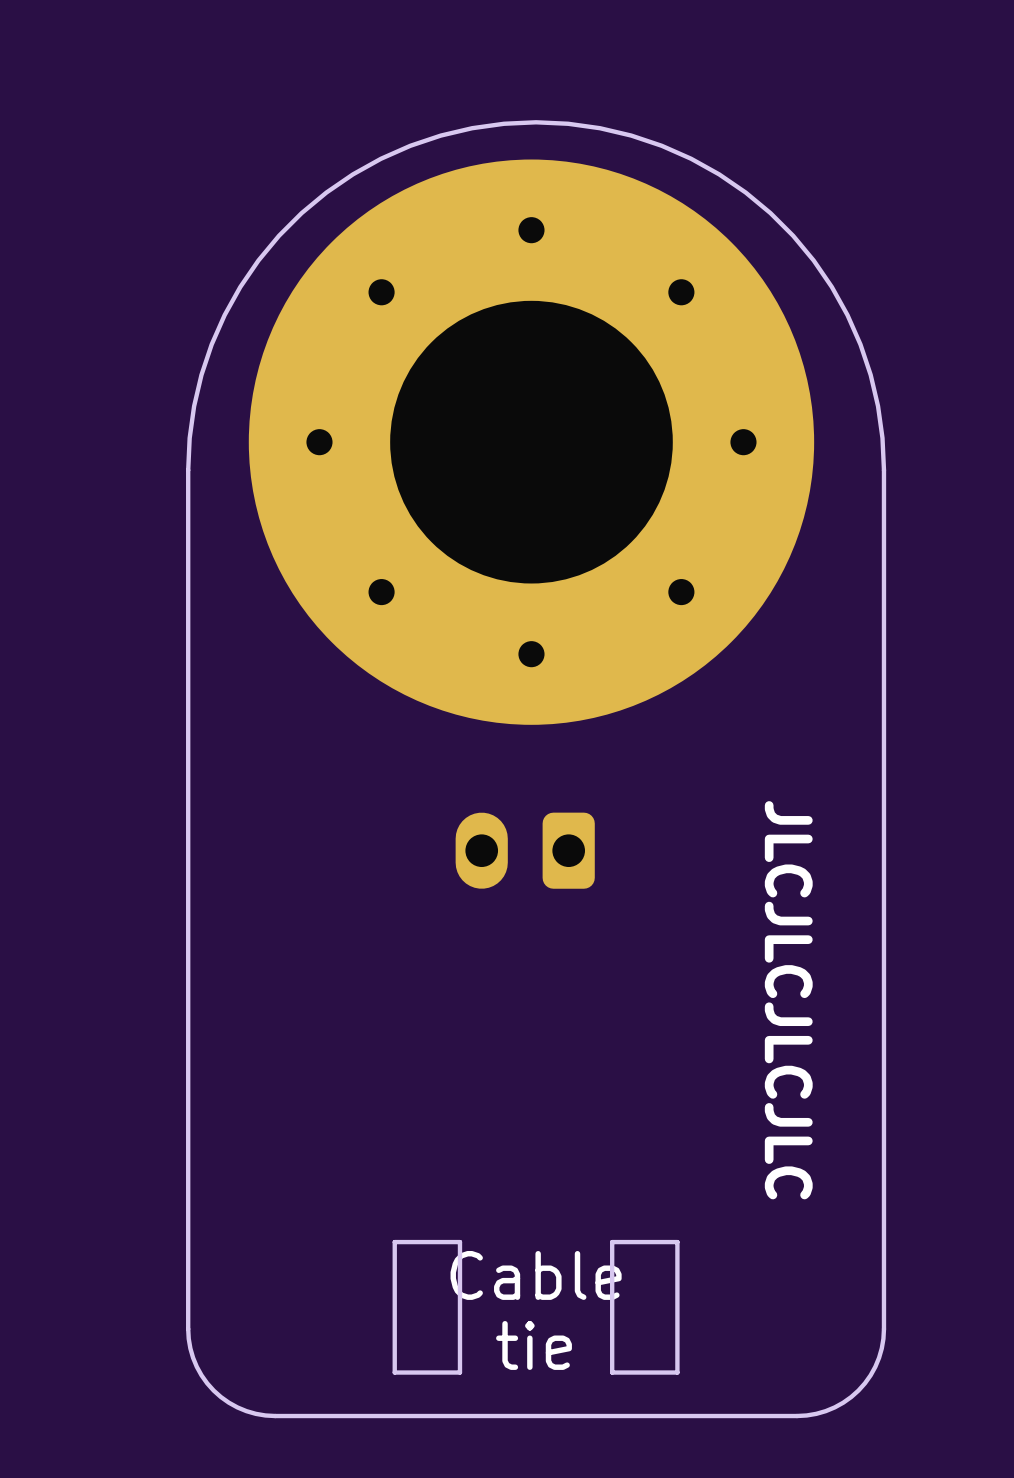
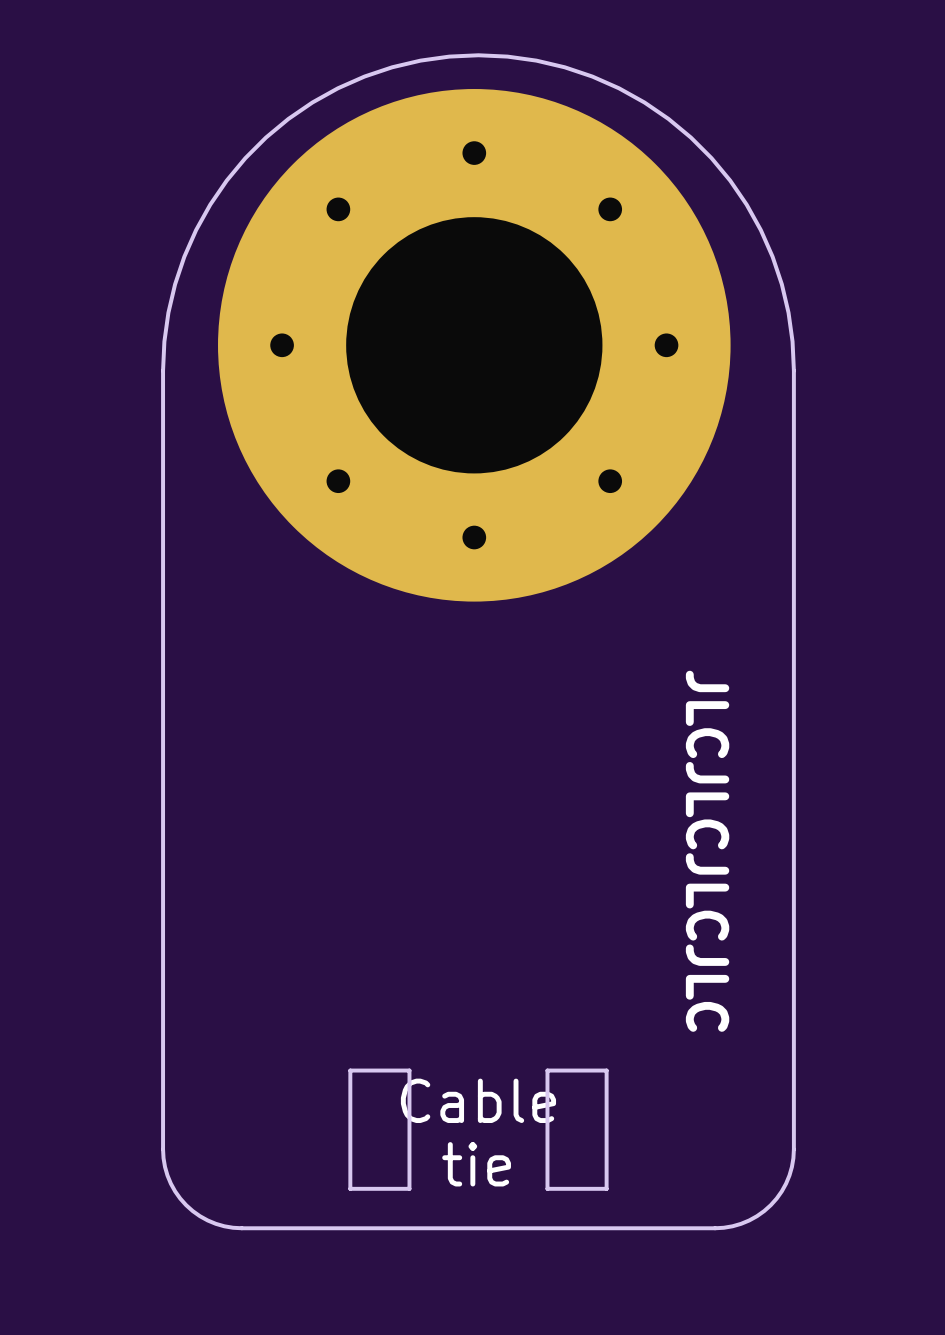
part: (525, 850) -> none

